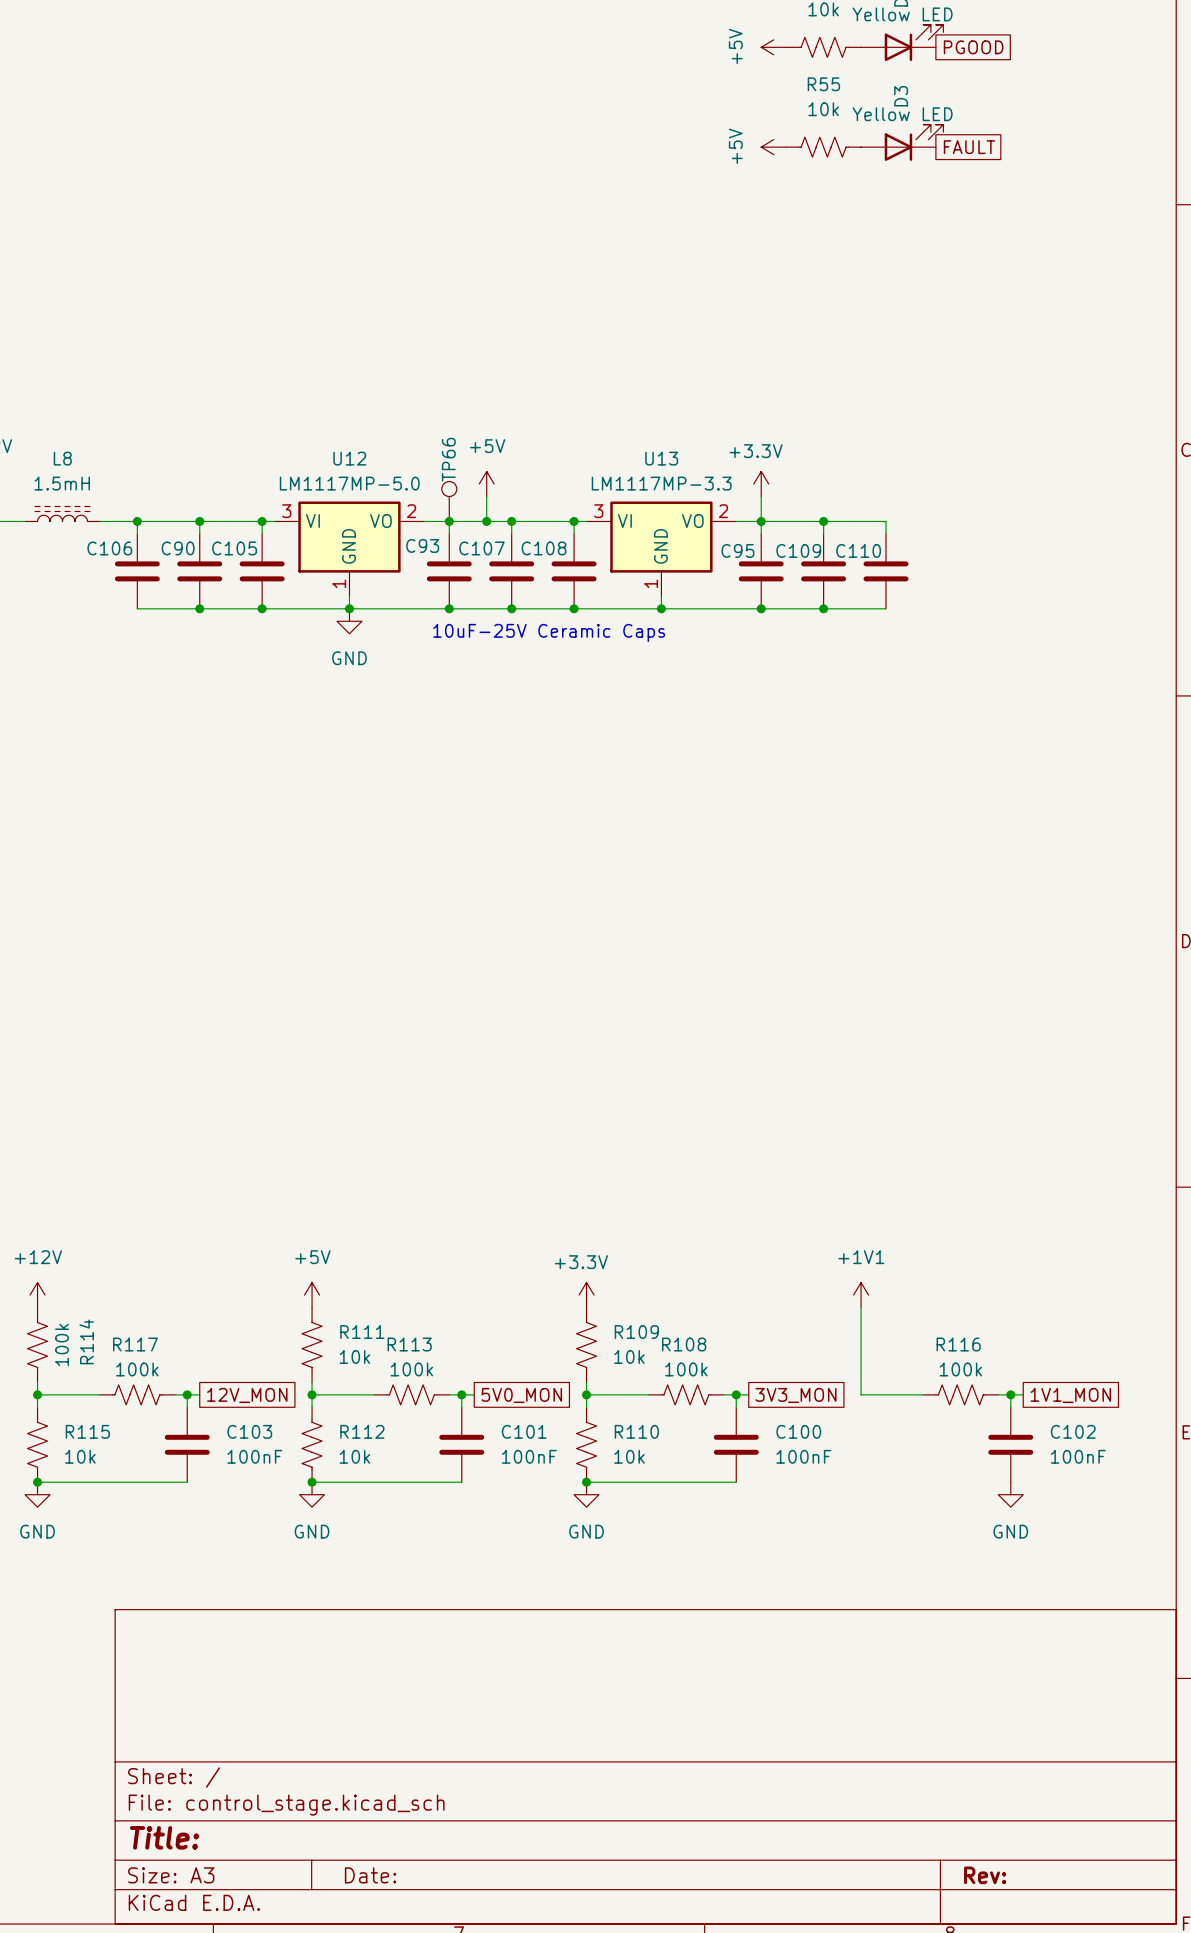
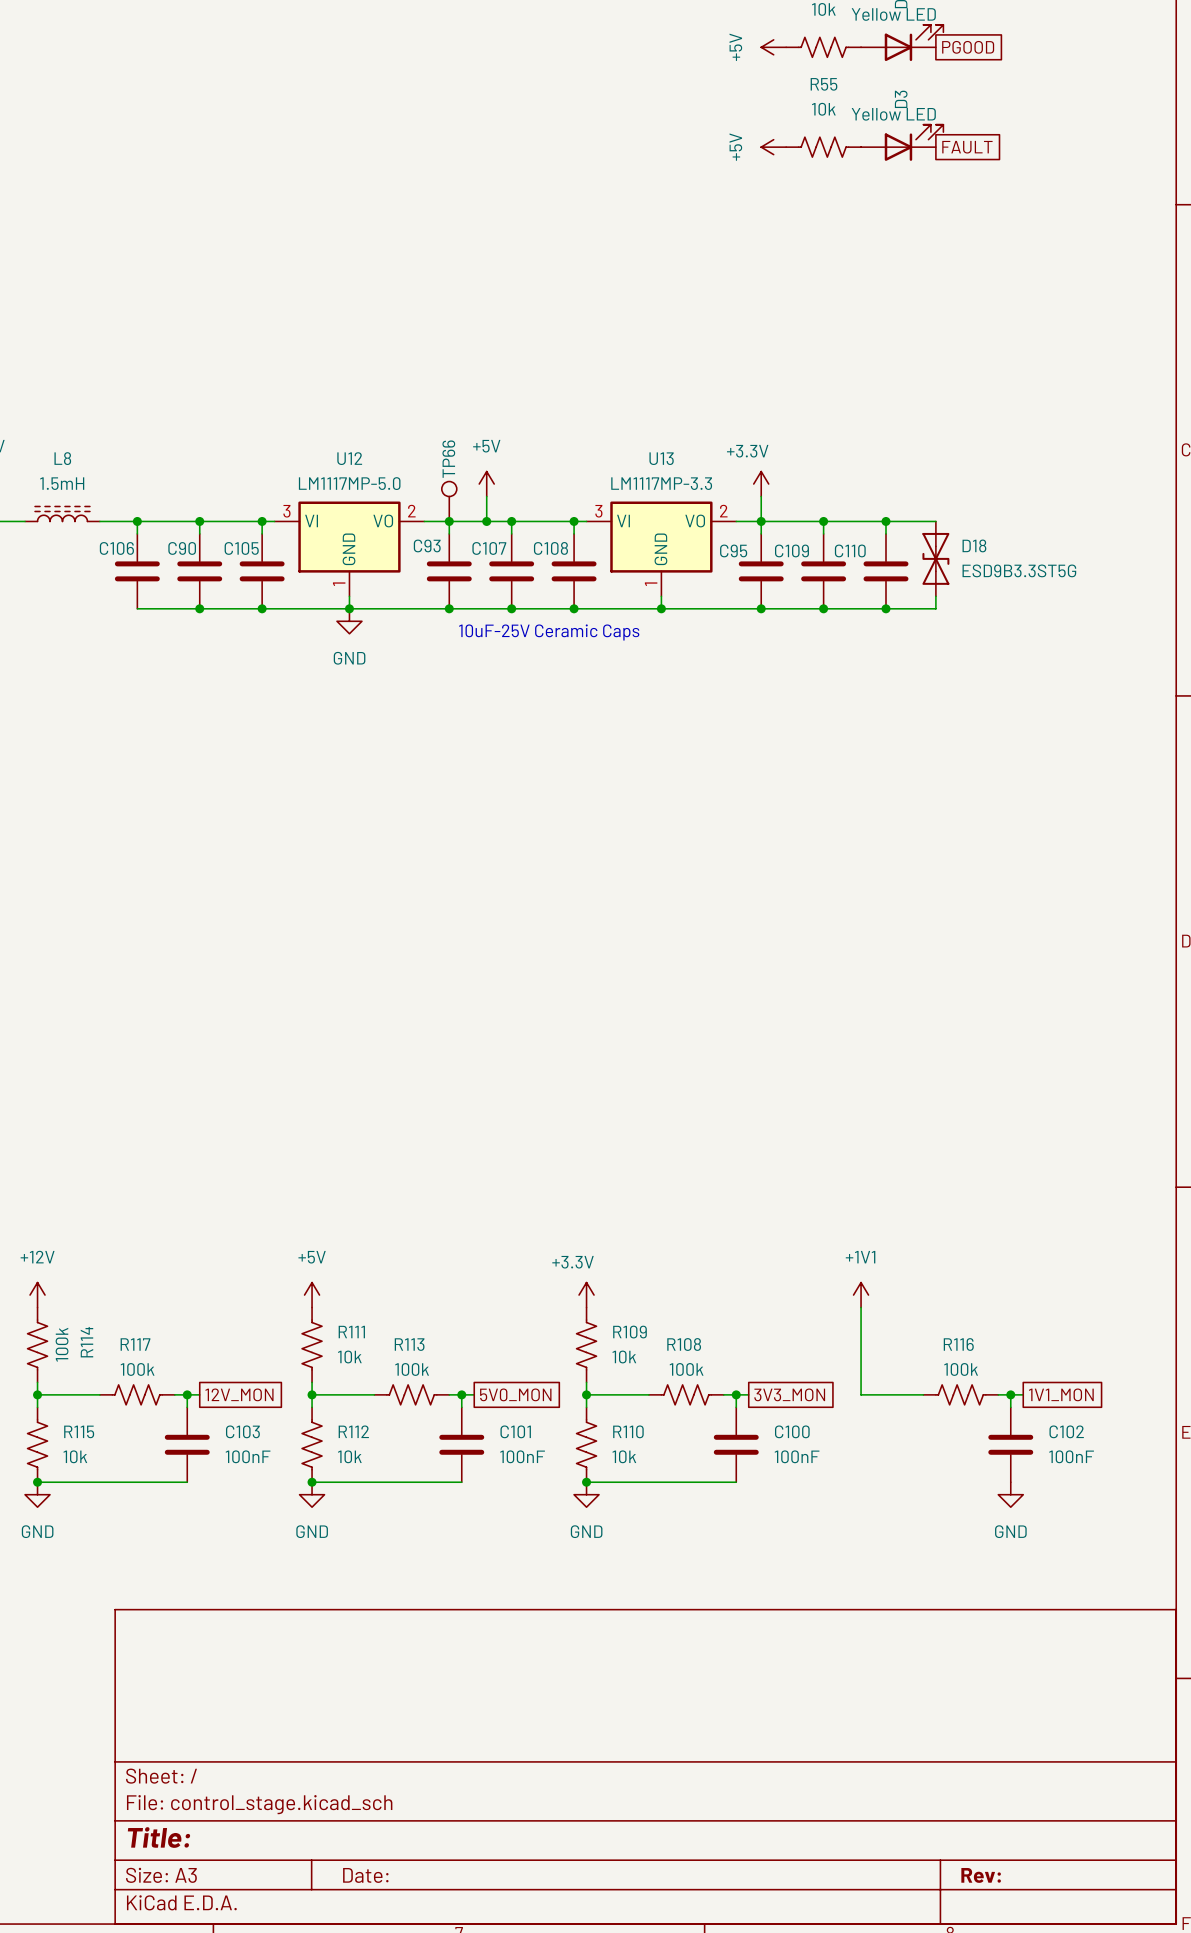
wire: none -> (885, 521) (935, 521)
junction: none -> (885, 521)
D18: none -> ESD9B3.3ST5G (935, 558)
wire: none -> (935, 596) (935, 608) (885, 608)
junction: none -> (885, 608)

